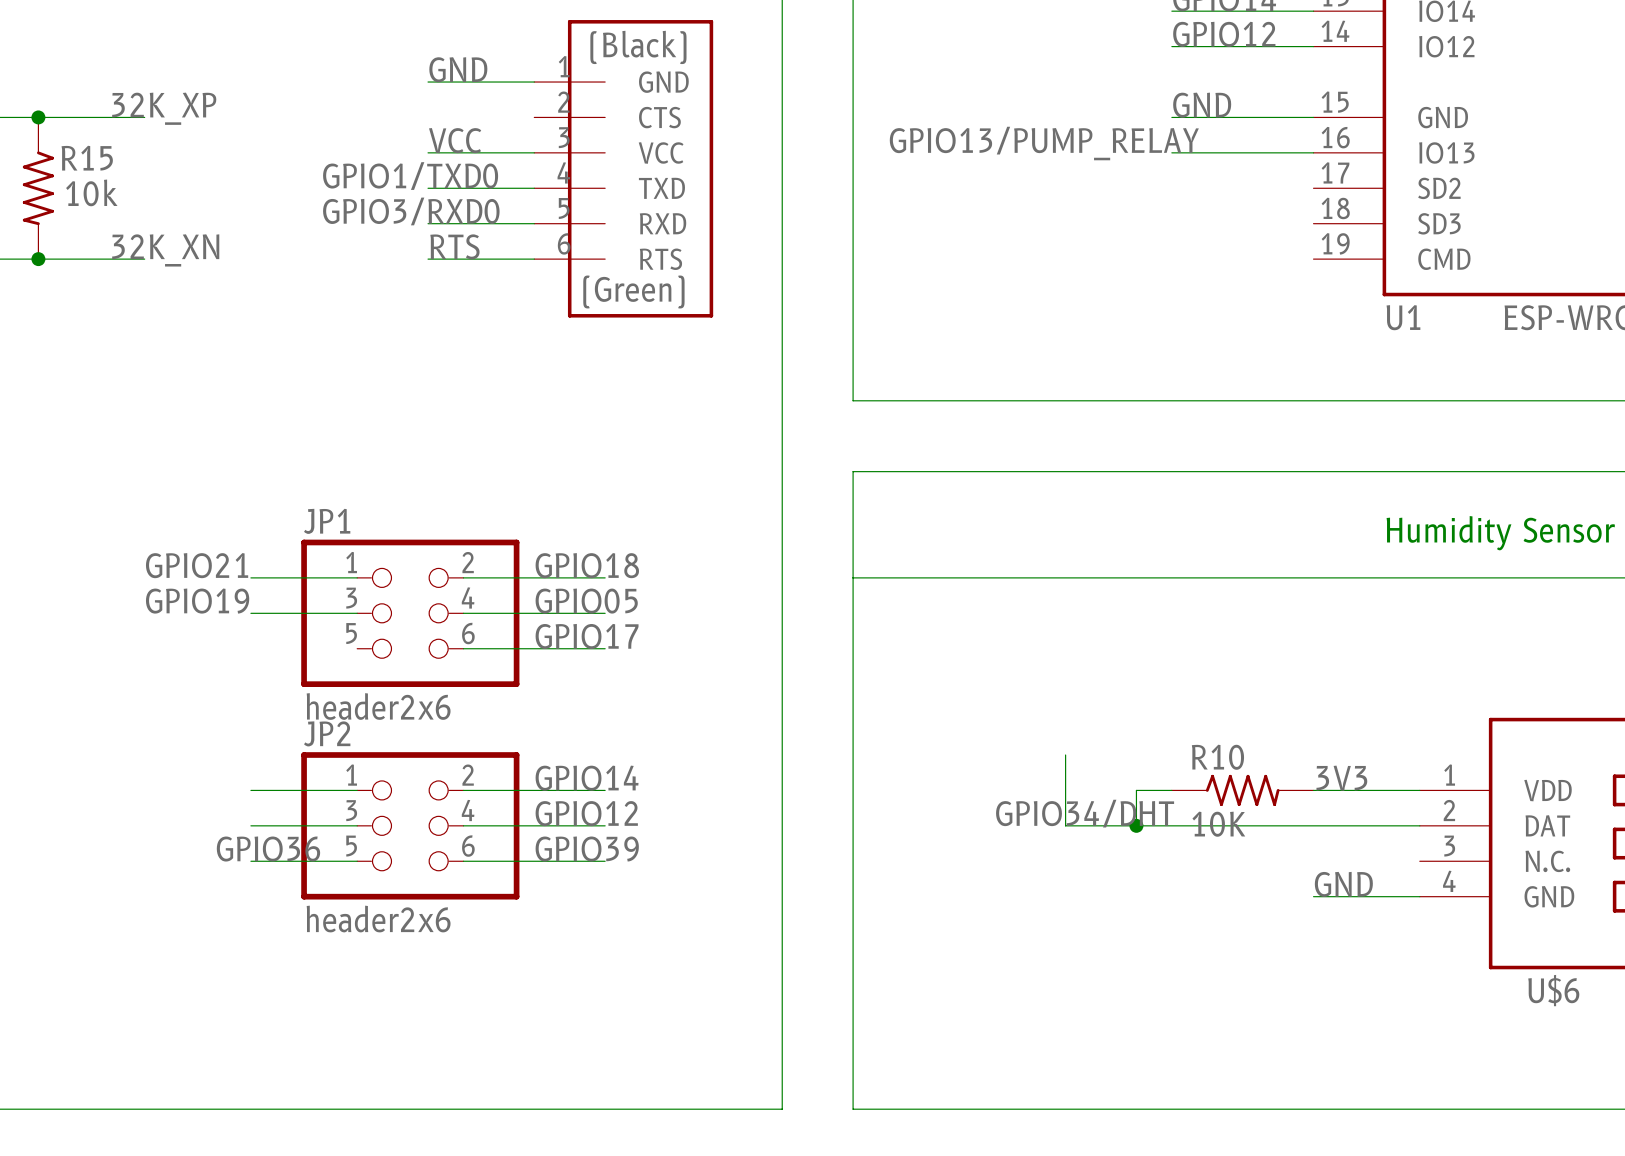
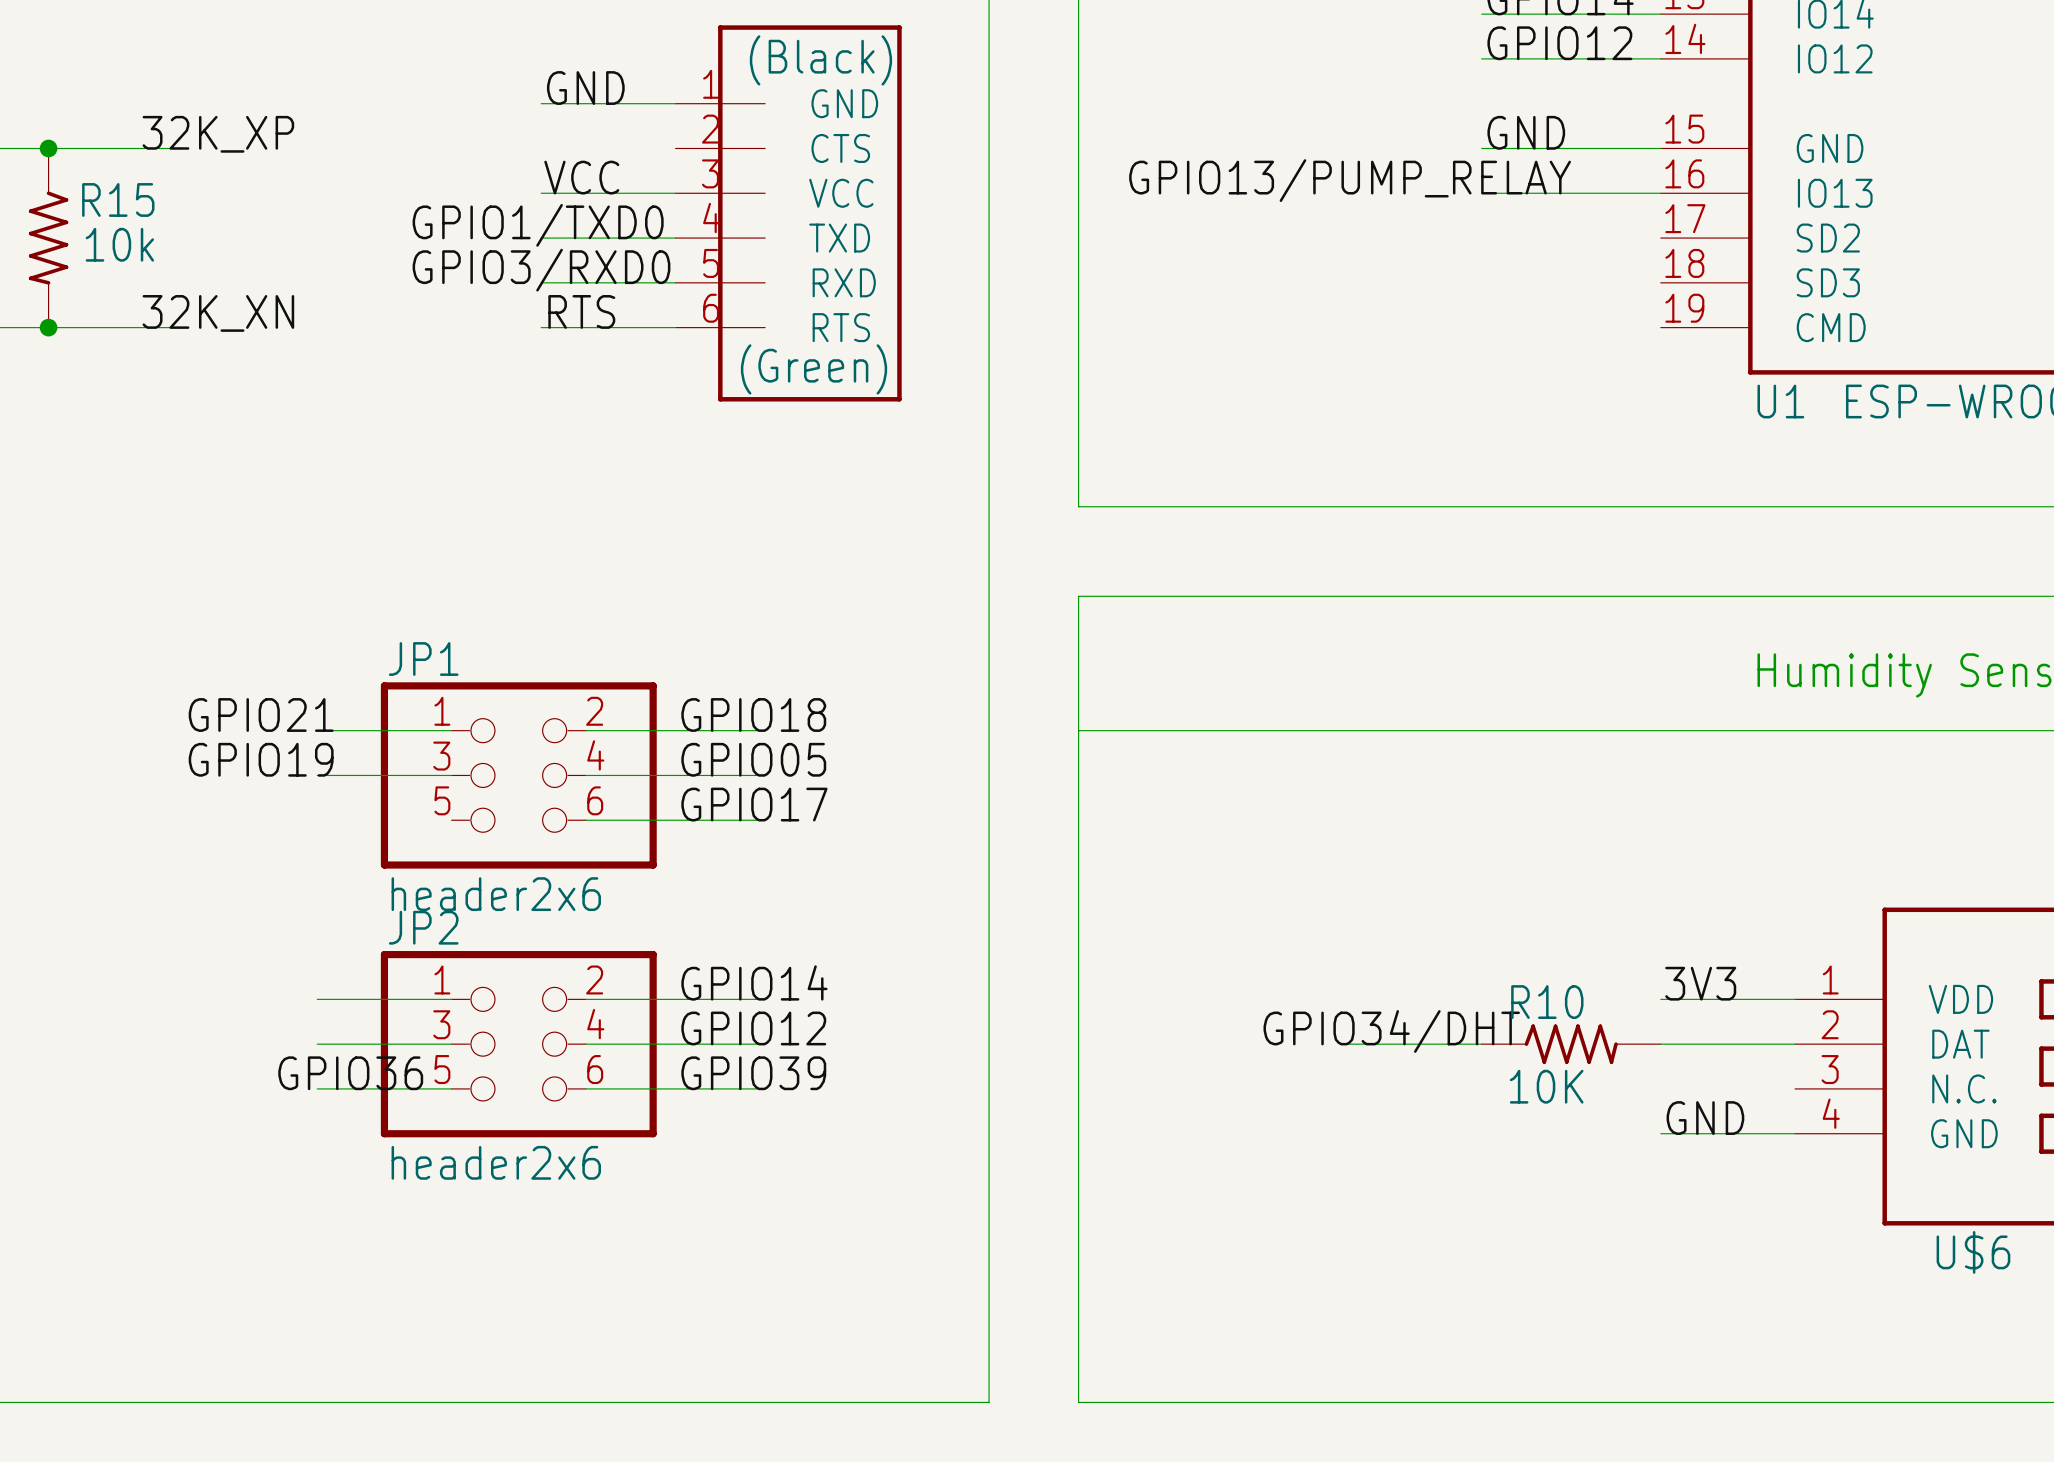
wire: (1065, 755) (1065, 825) -> none
wire: (1171, 790) (1136, 790) (1136, 825) -> none
R10 position: (1242, 790) -> (1571, 1044)
junction: (1136, 825) -> none

